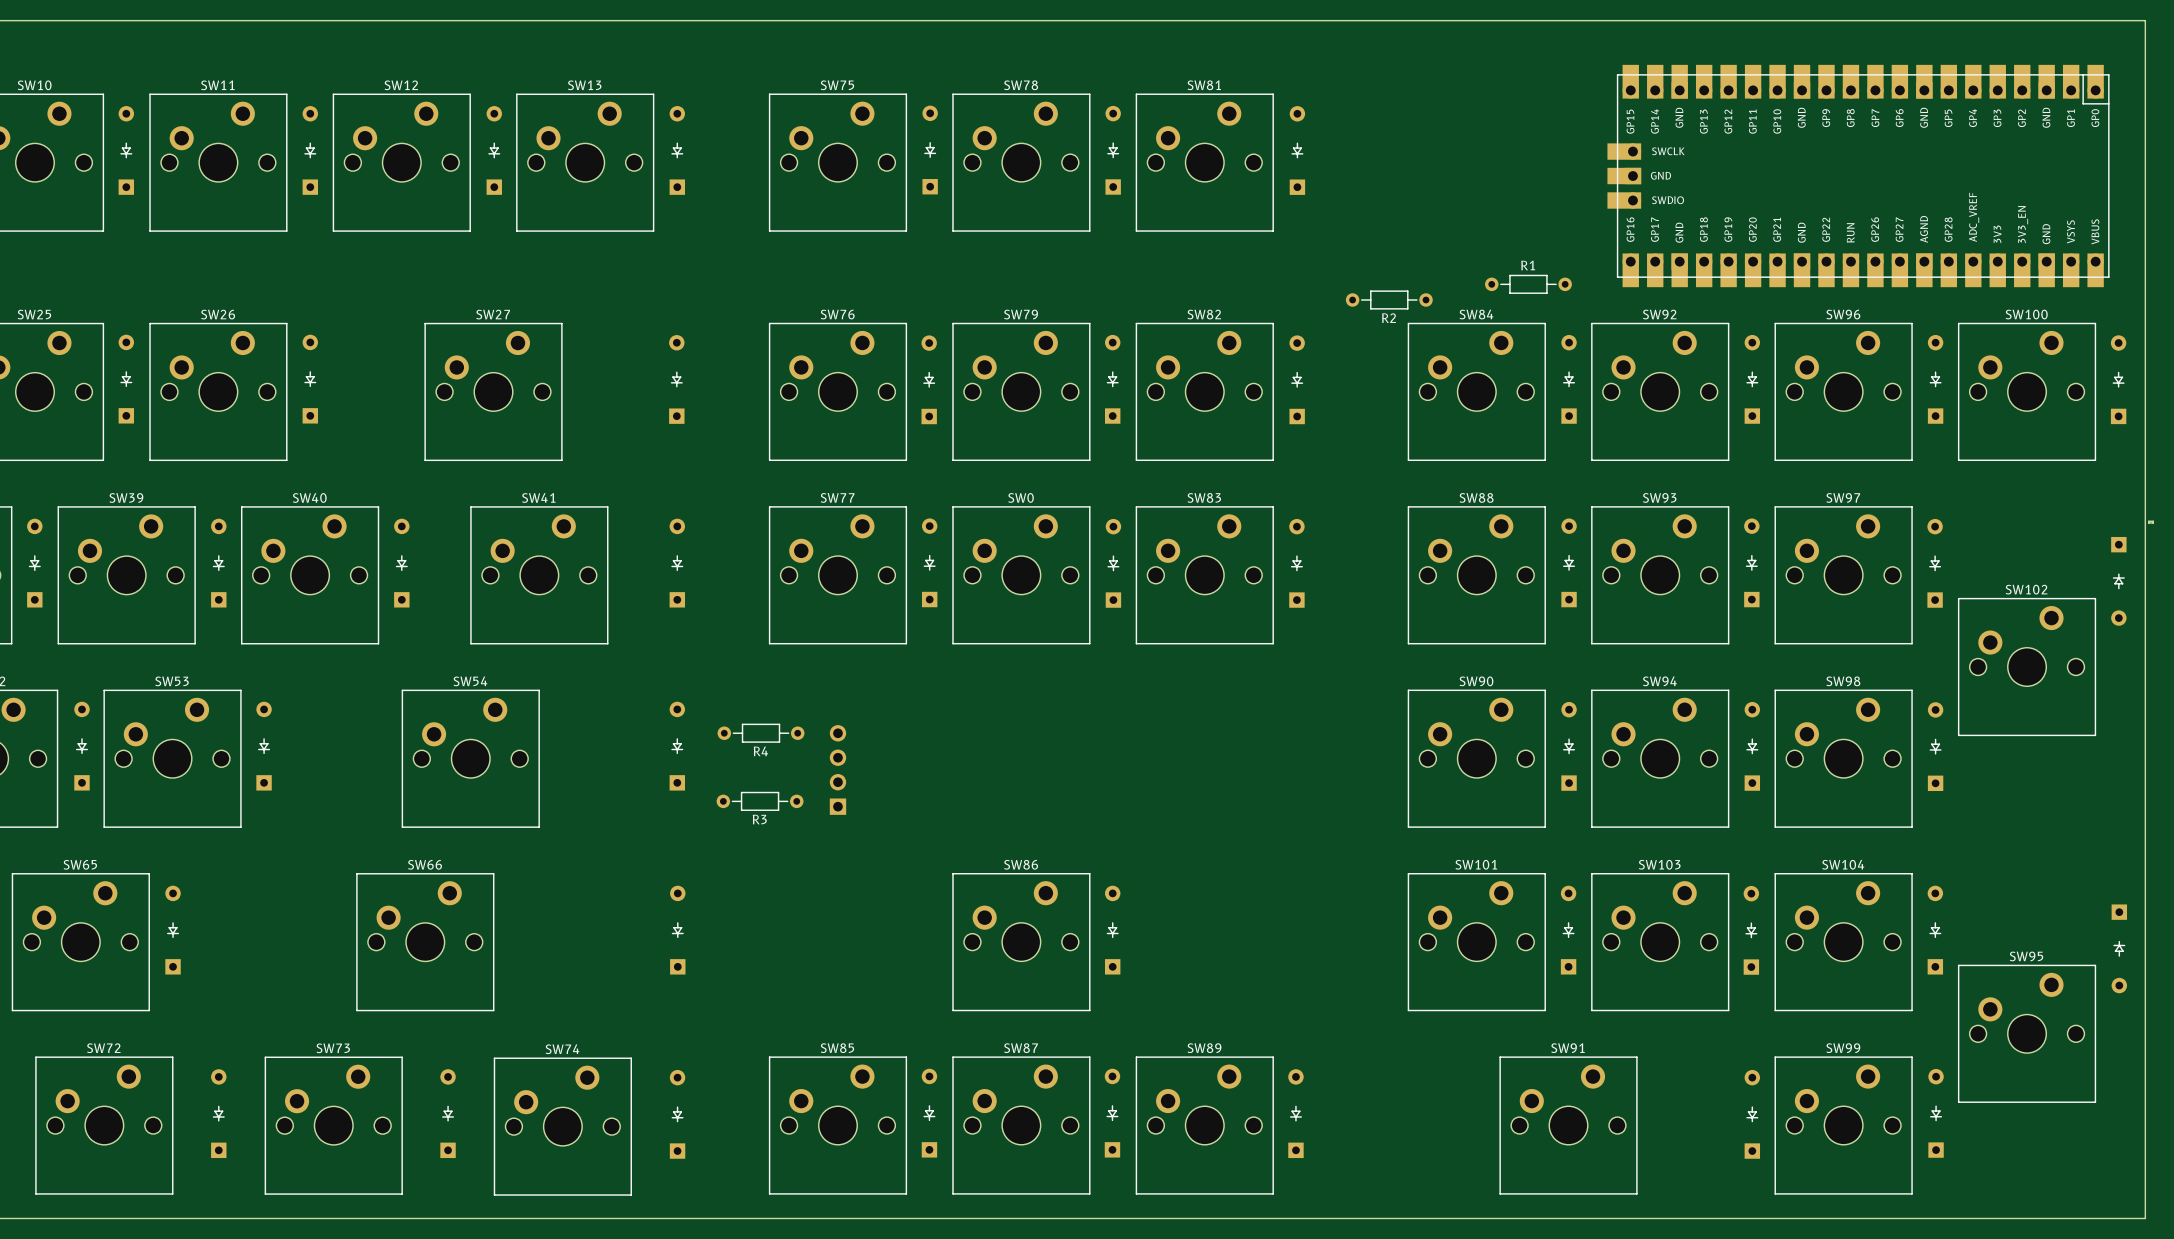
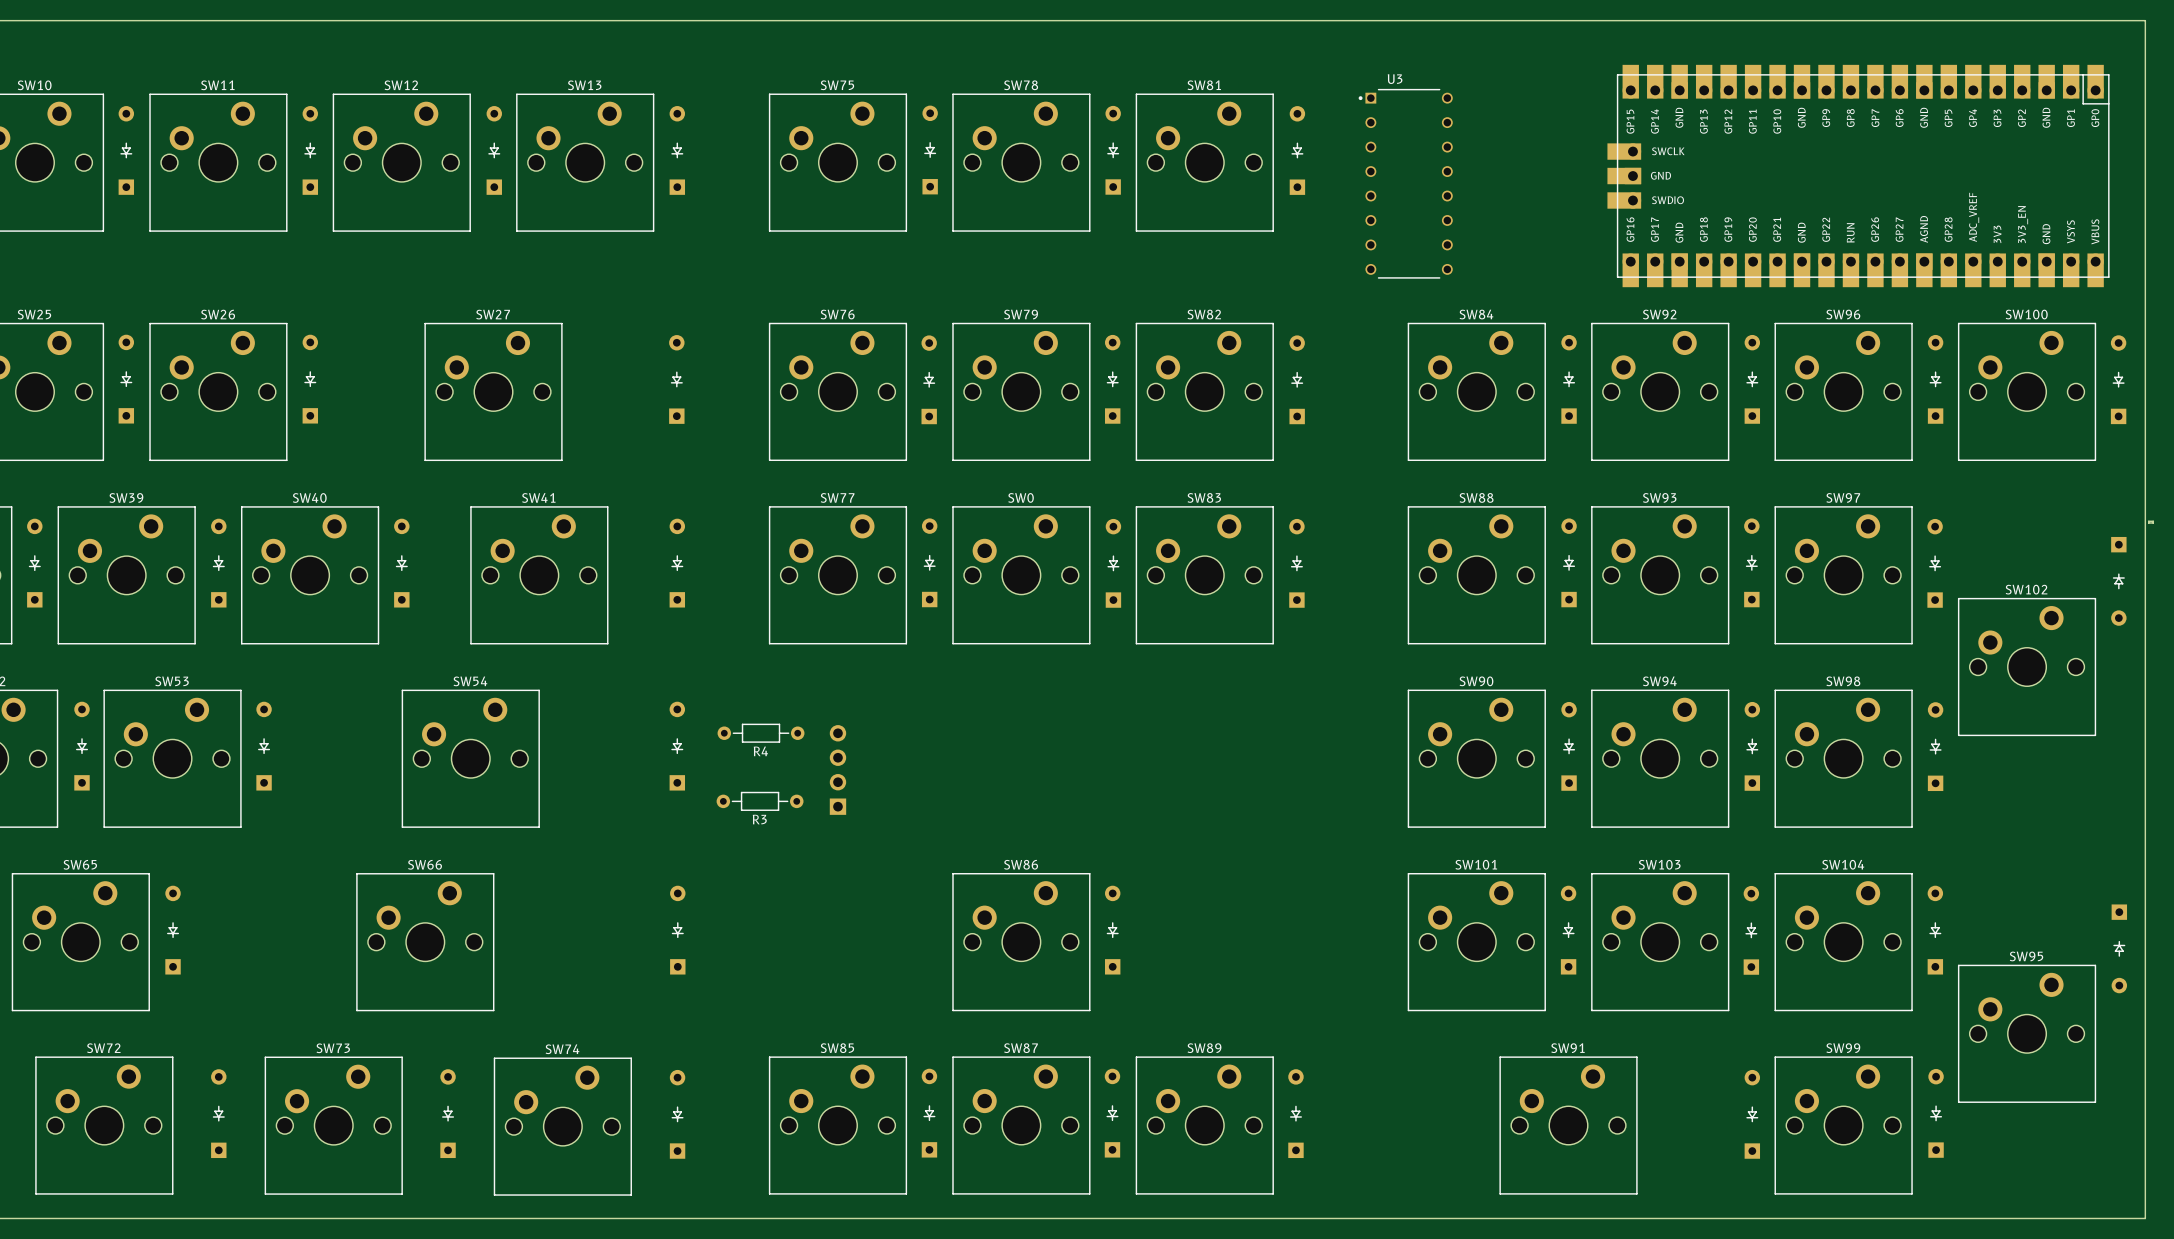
U3: none -> (1405, 183)
R1: (1528, 284) -> none
R2: (1389, 299) -> none

